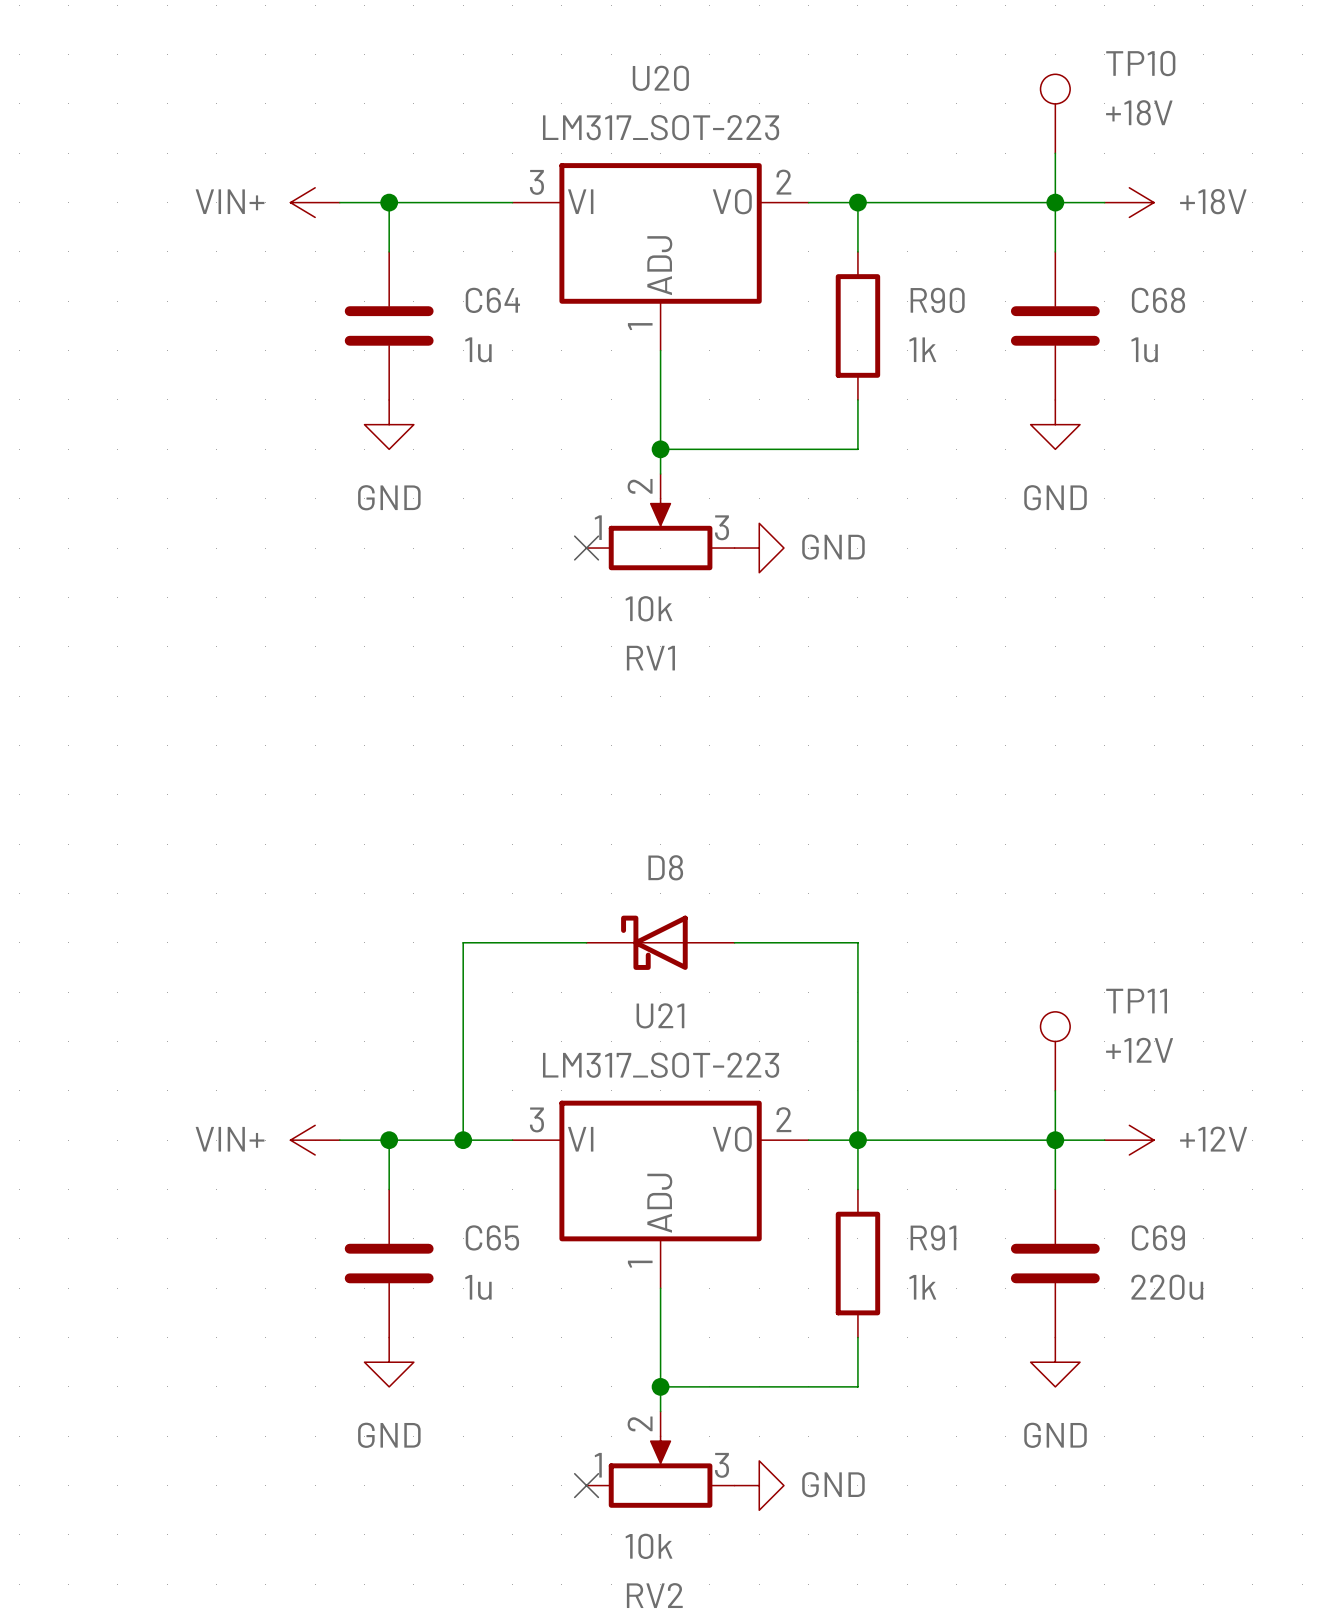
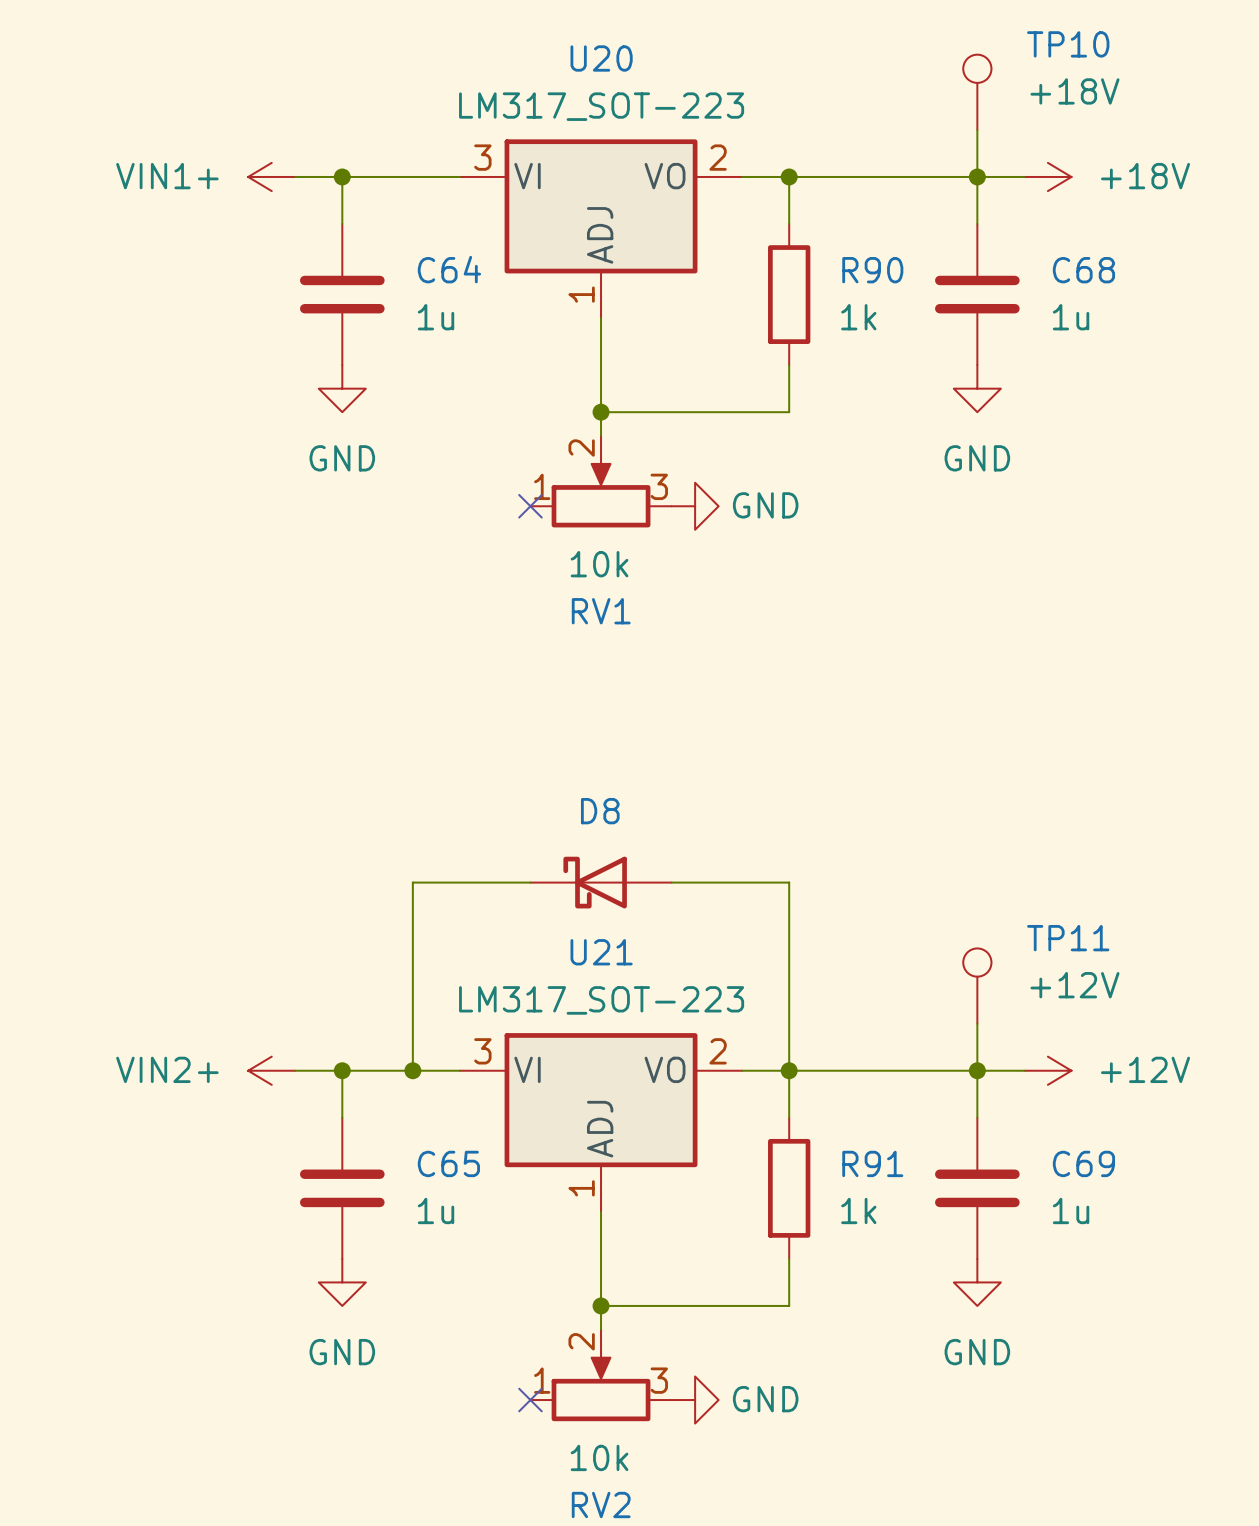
power symbol: VIN+ (315, 202) -> VIN1+ (271, 176)
power symbol: VIN+ (315, 1140) -> VIN2+ (271, 1070)
C69 value: 220u (1167, 1287) -> 1u (1071, 1210)

